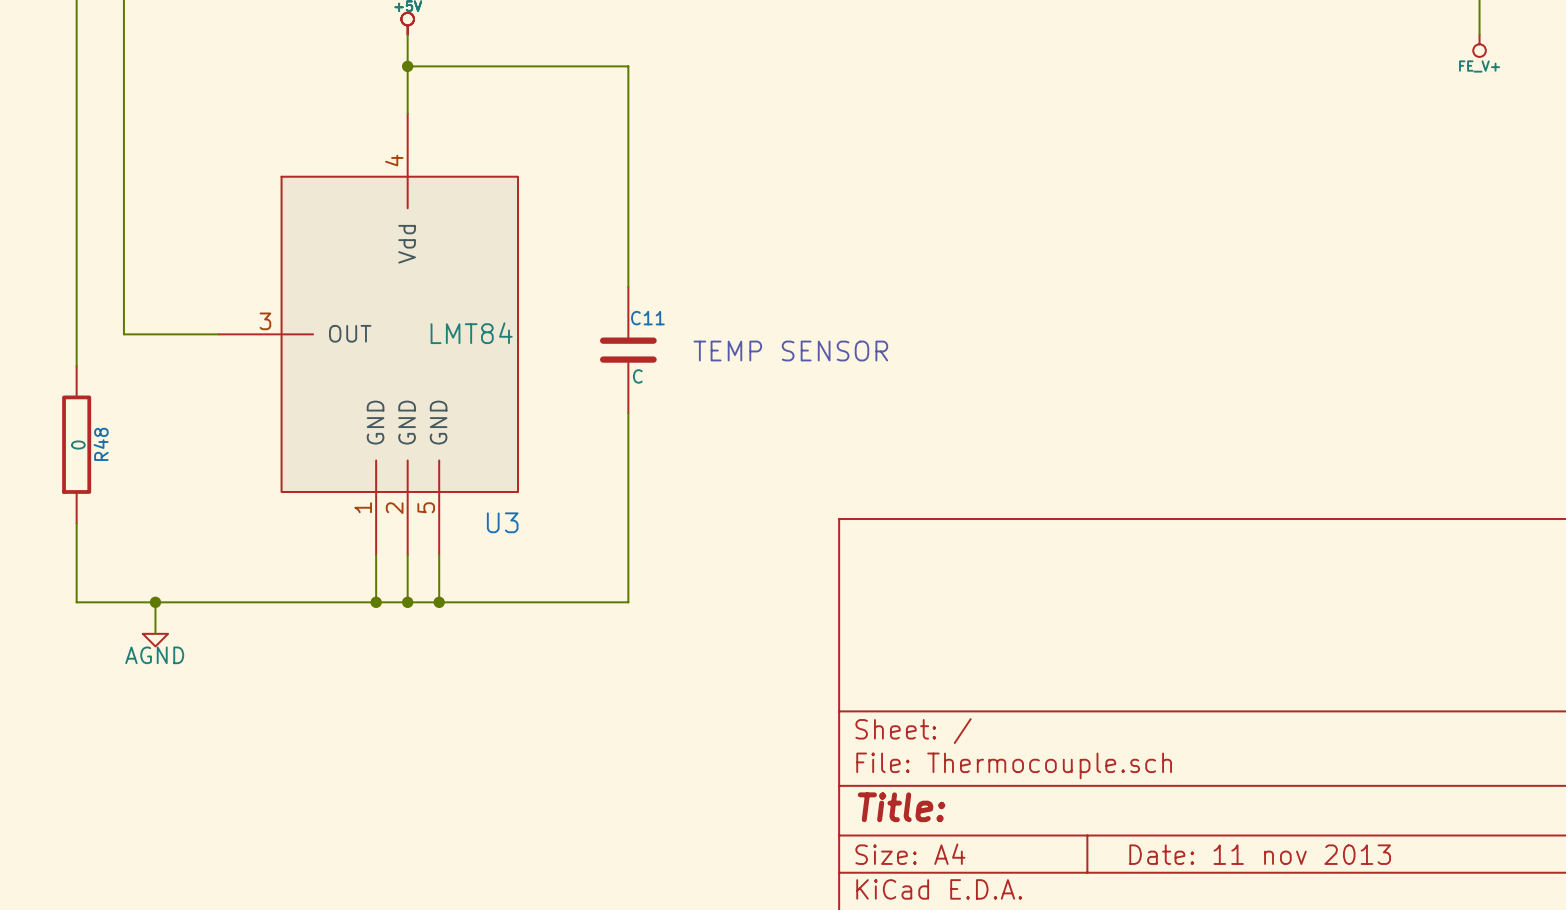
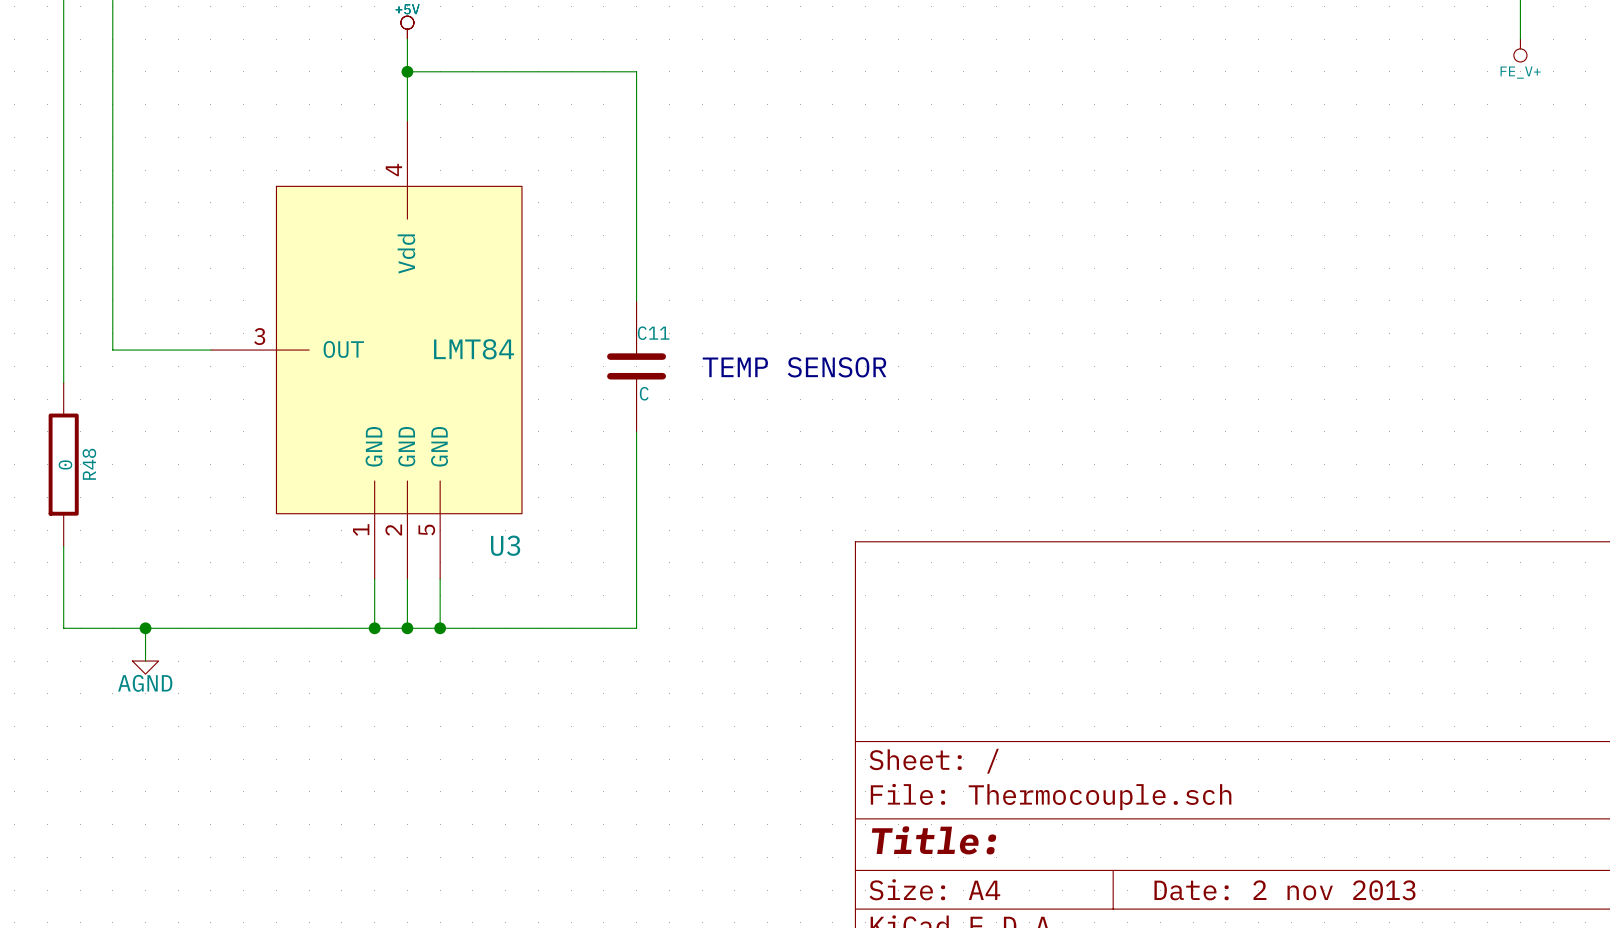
title block: Date: 11 nov 2013 (1260, 854) -> Date: 2 nov 2013 (1284, 890)

